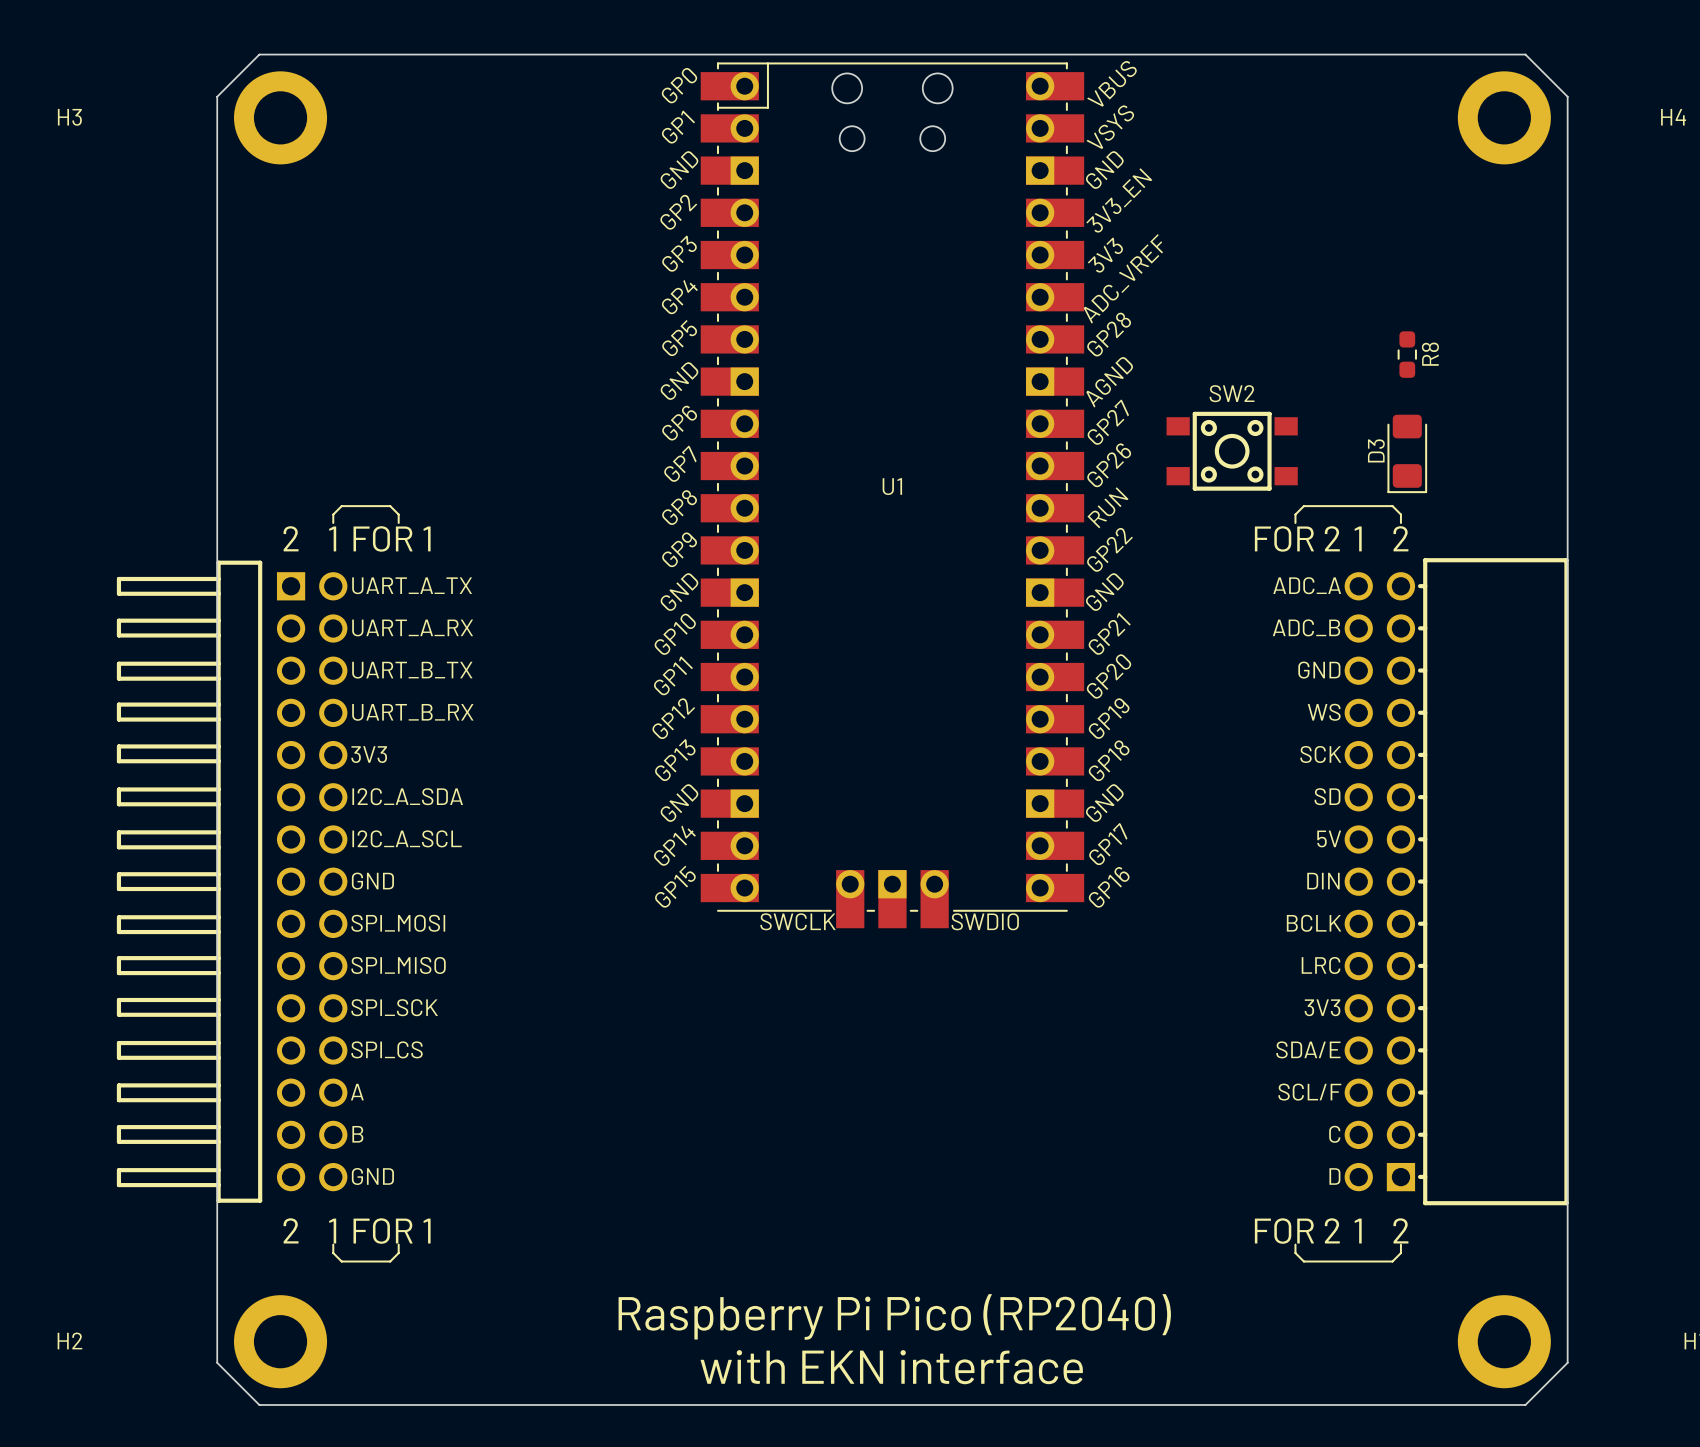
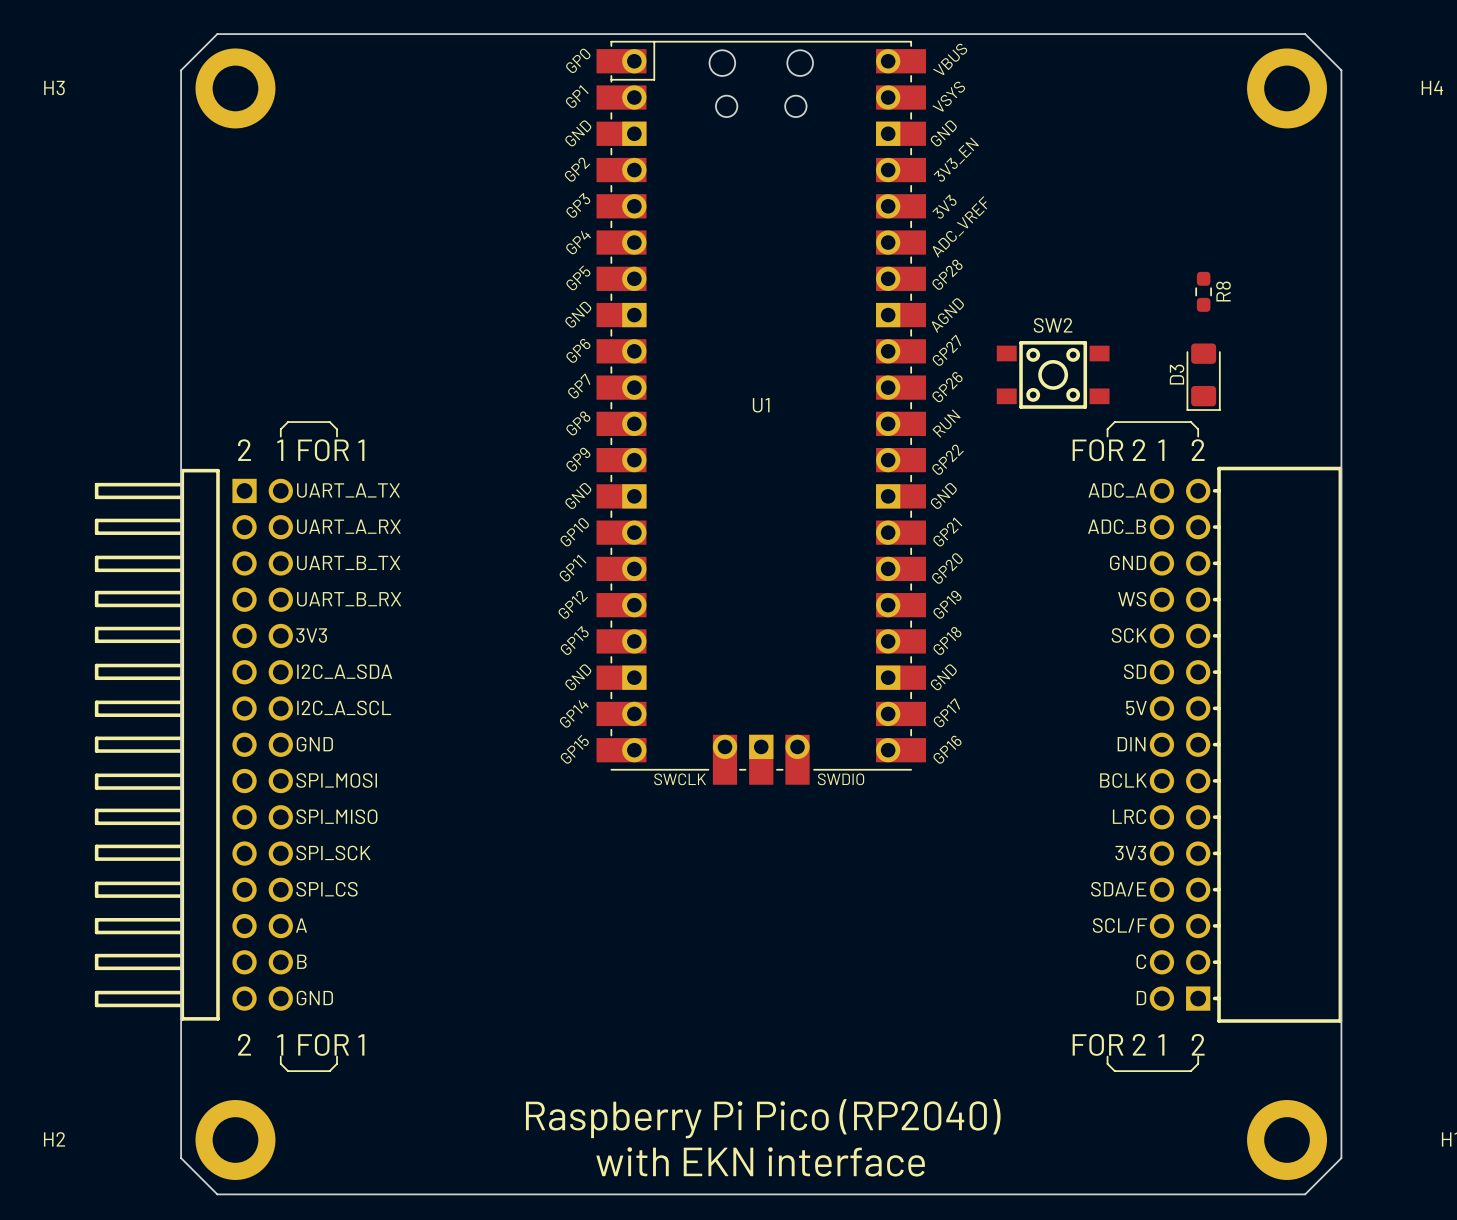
U1 footprint: [700, 62, 1085, 929] -> [596, 40, 926, 785]

